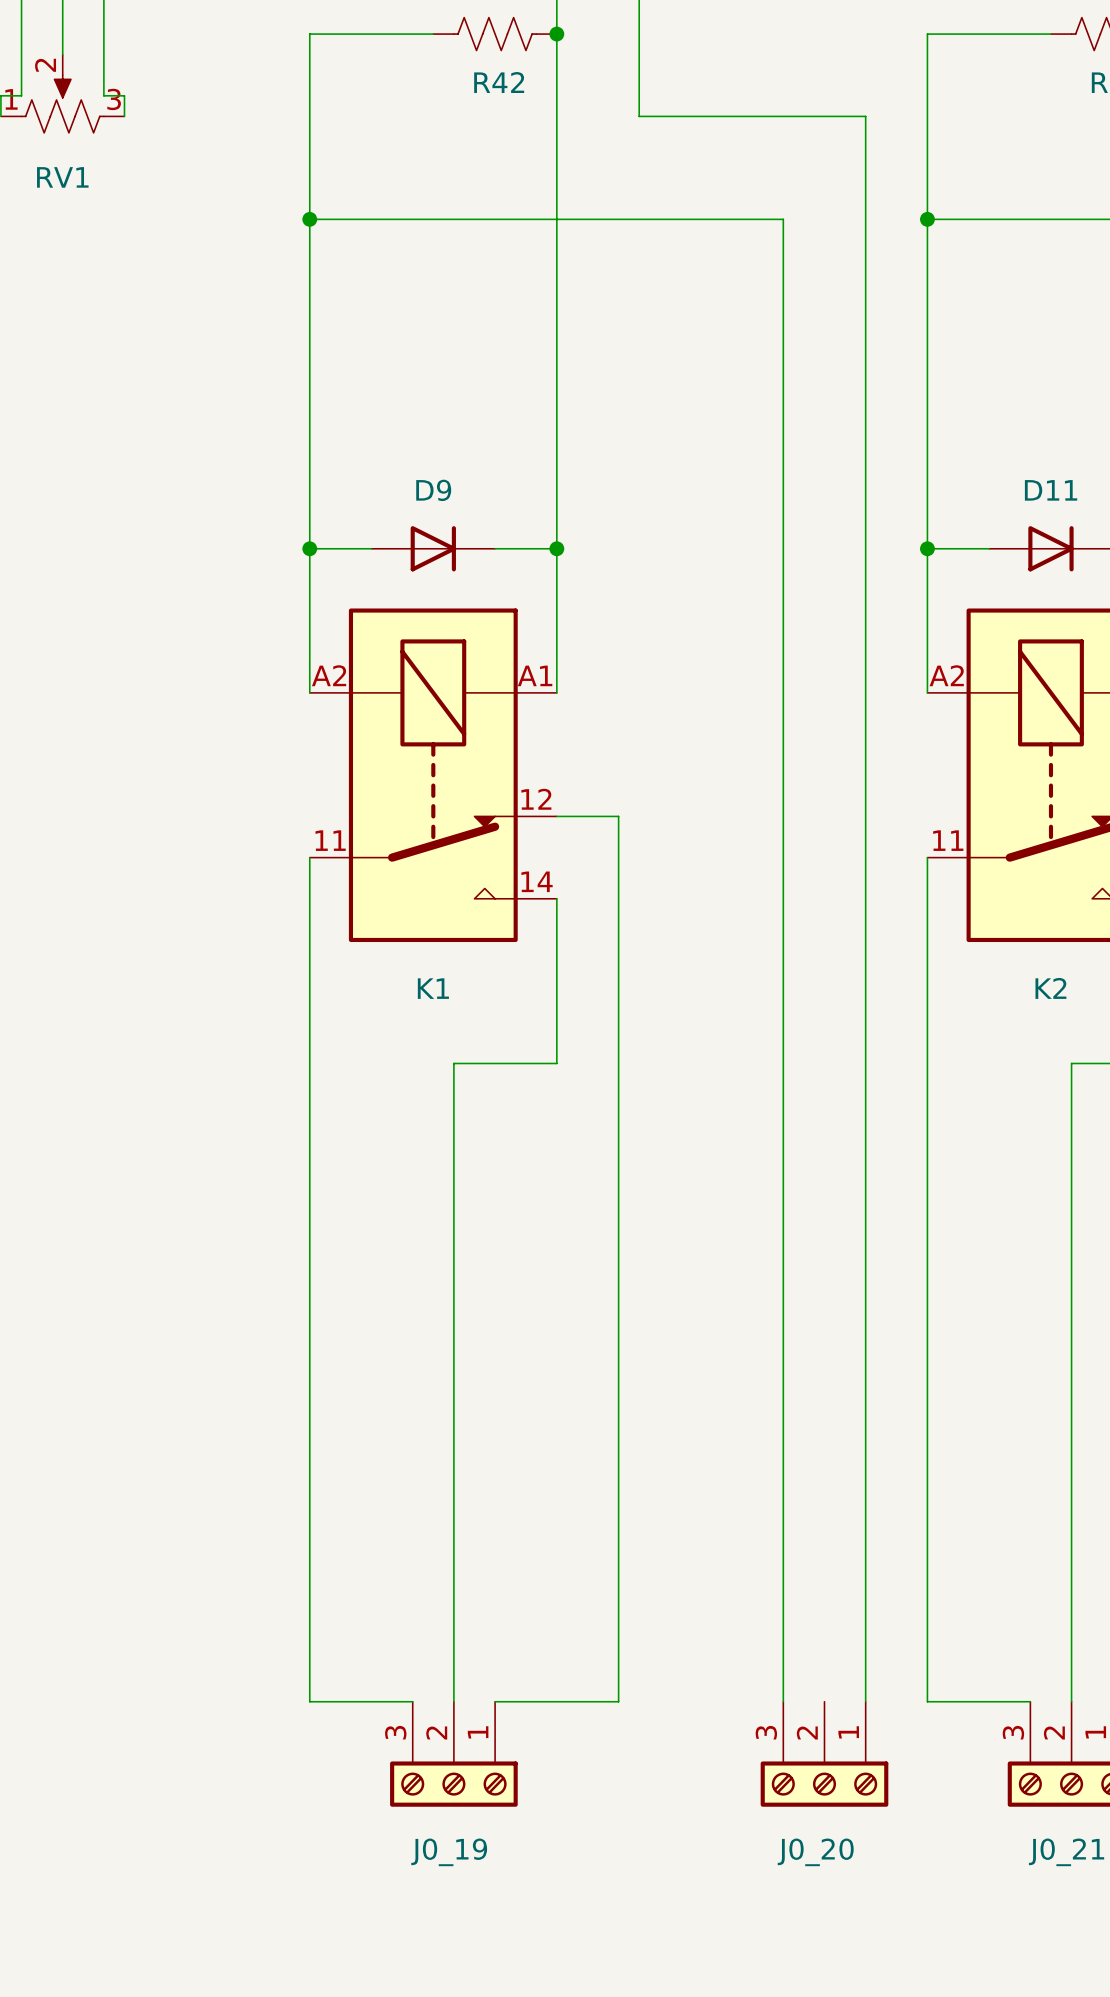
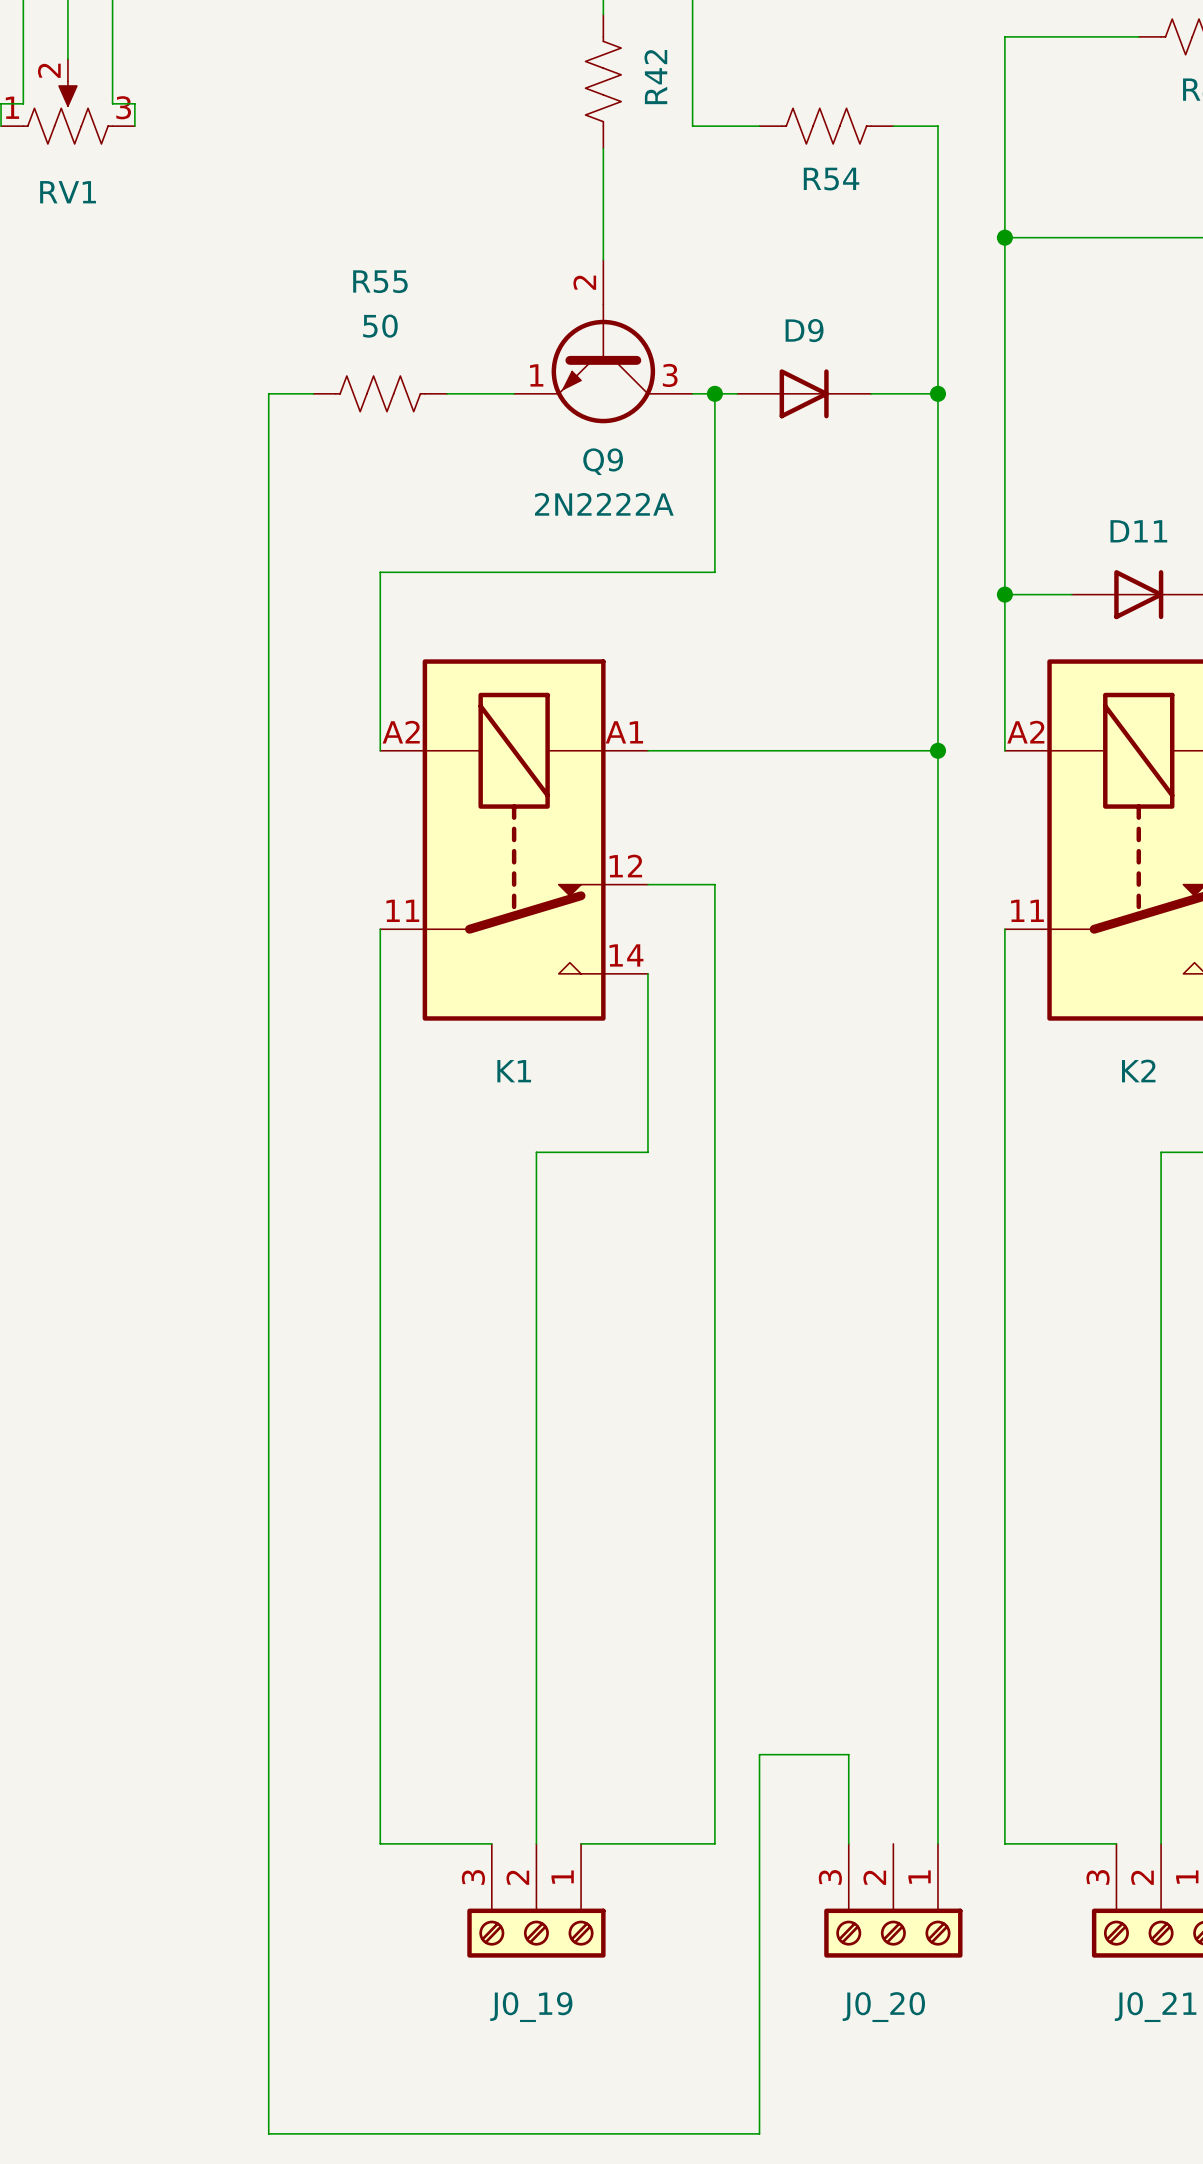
wire: (556, 13) (556, 137) -> none
wire: (433, 34) (309, 34) (309, 692) -> none
R42 rotation: 0° (495, 34) -> 90° clockwise (603, 81)
R42 position: (495, 34) -> (603, 81)
junction: (556, 34) -> none
R42 name position: R42 (499, 82) -> R42 (655, 77)
wire: (700, 116) (824, 116) -> none
R54: none -> (826, 126)
wire: (309, 219) (783, 219) (783, 1619) -> (313, 393) (268, 393) (268, 2133) (759, 2133) (759, 1754) (848, 1754)
junction: (309, 219) -> none
wire: (556, 239) (556, 692) -> none
Q9: none -> 2N2222A (603, 341)
R55: none -> 50 (380, 393)
wire: none -> (692, 393) (737, 393)
wire: none -> (714, 393) (714, 572) (380, 572) (380, 750)
junction: none -> (714, 393)
wire: none -> (871, 393) (937, 393)
junction: none -> (937, 393)
wire: (309, 548) (371, 548) -> none
junction: (309, 548) -> none
D9 position: (433, 548) -> (804, 393)
wire: (495, 548) (556, 548) -> (447, 393) (514, 393)
junction: (556, 548) -> none
wire: none -> (647, 750) (937, 750)
junction: none -> (937, 750)
K1 position: (433, 775) -> (514, 840)
wire: (618, 816) (618, 1701) -> (670, 884) (714, 884) (714, 1843) (670, 1843)
wire: (309, 857) (309, 1701) (350, 1701) -> (380, 929) (380, 1843)
wire: (556, 898) (556, 1063) -> (647, 973) (647, 1152) (603, 1152)
wire: (495, 1063) (453, 1063) (453, 1701) -> (536, 1152) (536, 1843)
wire: (495, 1701) (536, 1701) -> (447, 1843) (491, 1843)
J0_19 position: (453, 1754) -> (536, 1900)

